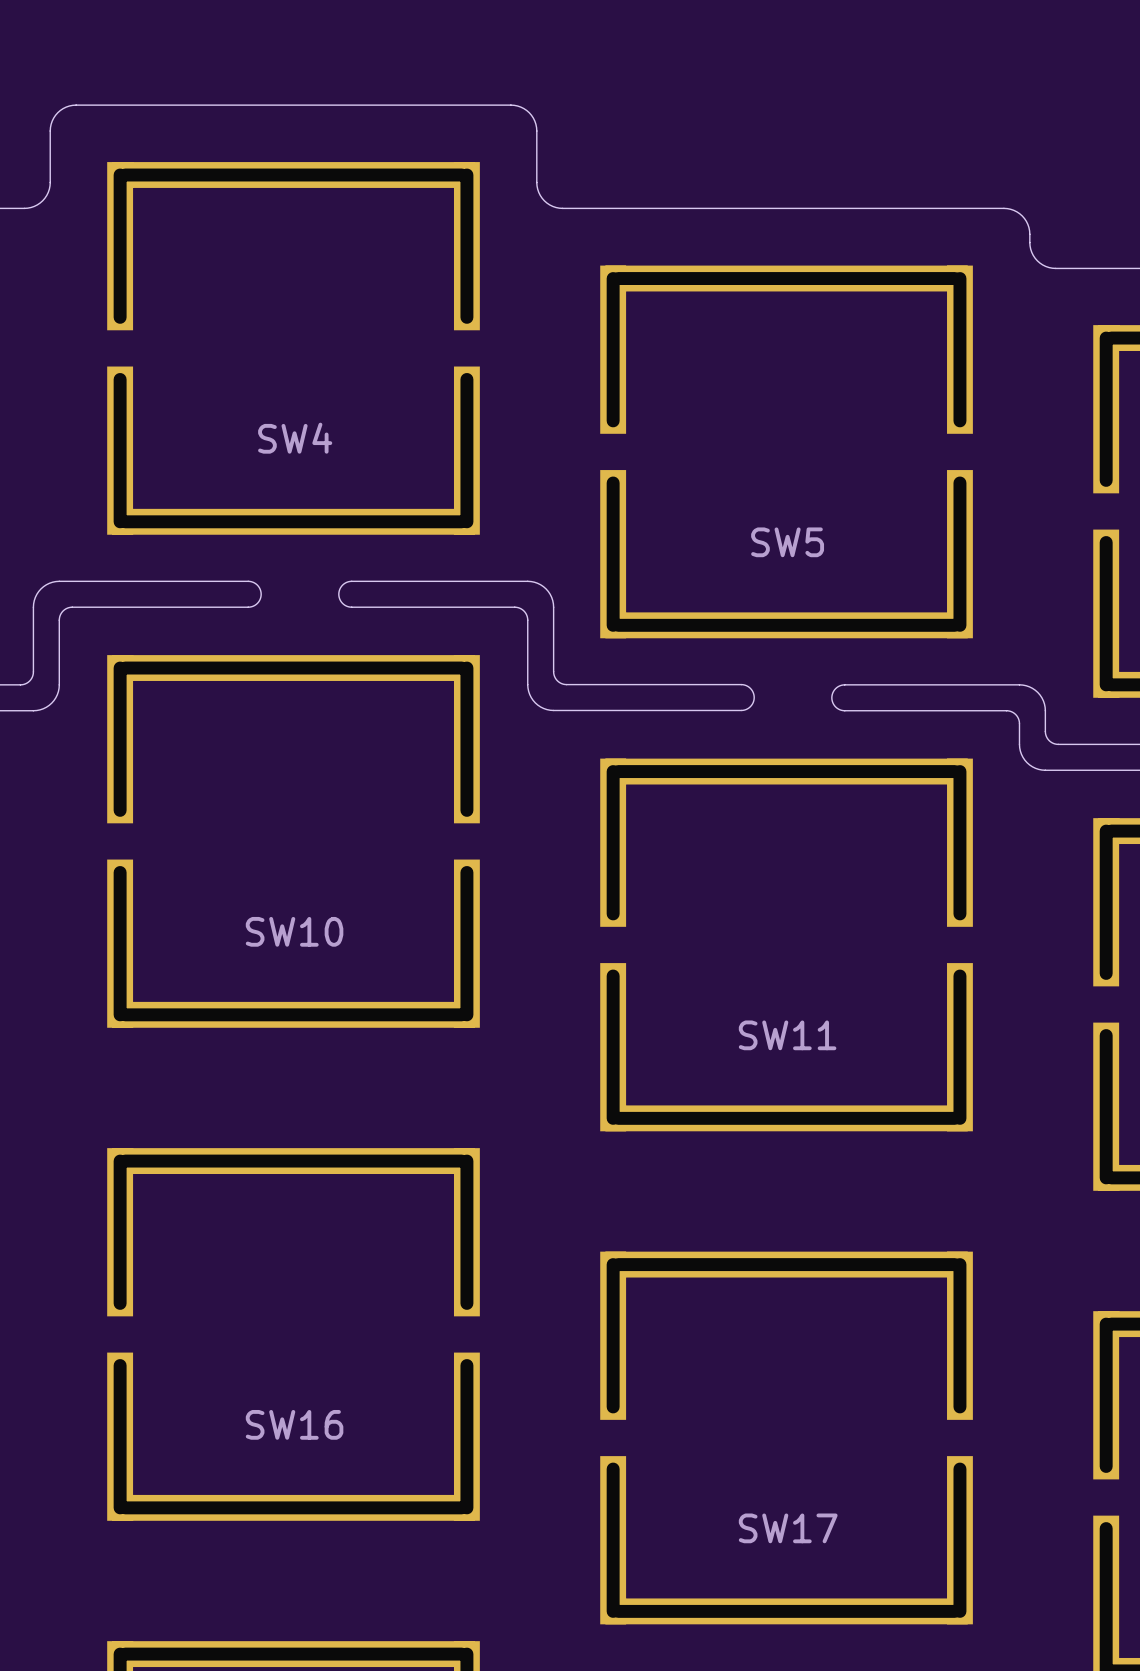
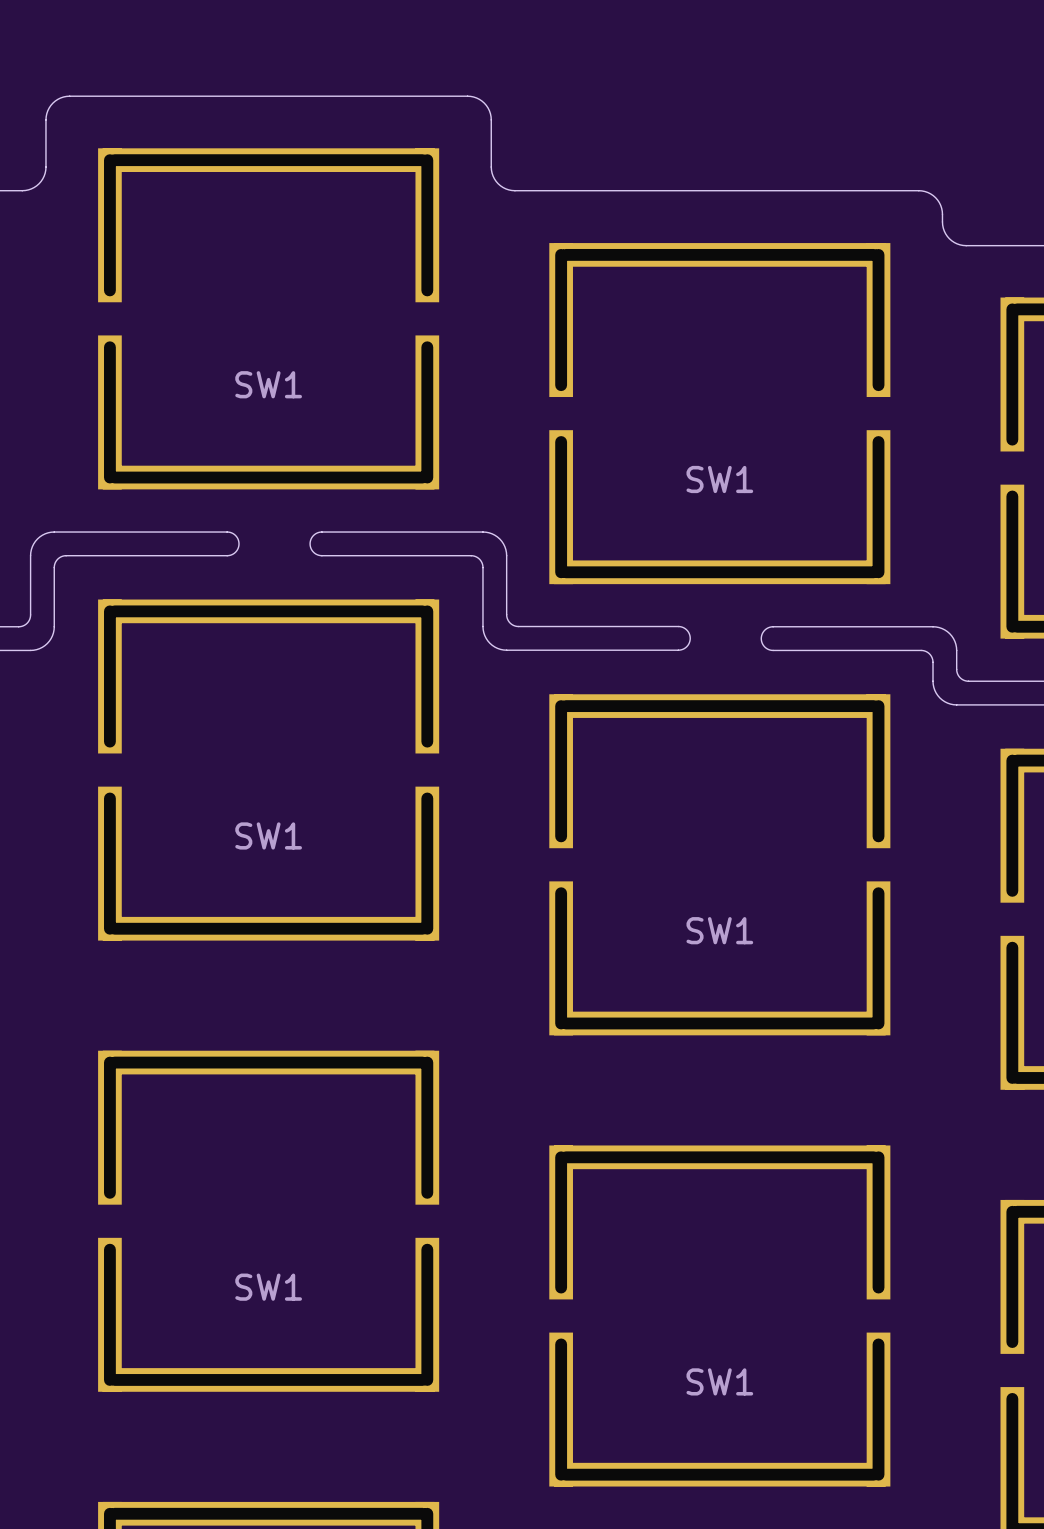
SW4 name: SW4 (295, 438) -> SW1 (268, 384)
SW5 name: SW5 (787, 542) -> SW1 (719, 479)
SW10 name: SW10 (294, 931) -> SW1 (268, 835)
SW11 name: SW11 (787, 1035) -> SW1 (719, 930)
SW16 name: SW16 (294, 1424) -> SW1 (268, 1287)
SW17 name: SW17 (788, 1528) -> SW1 (719, 1381)

